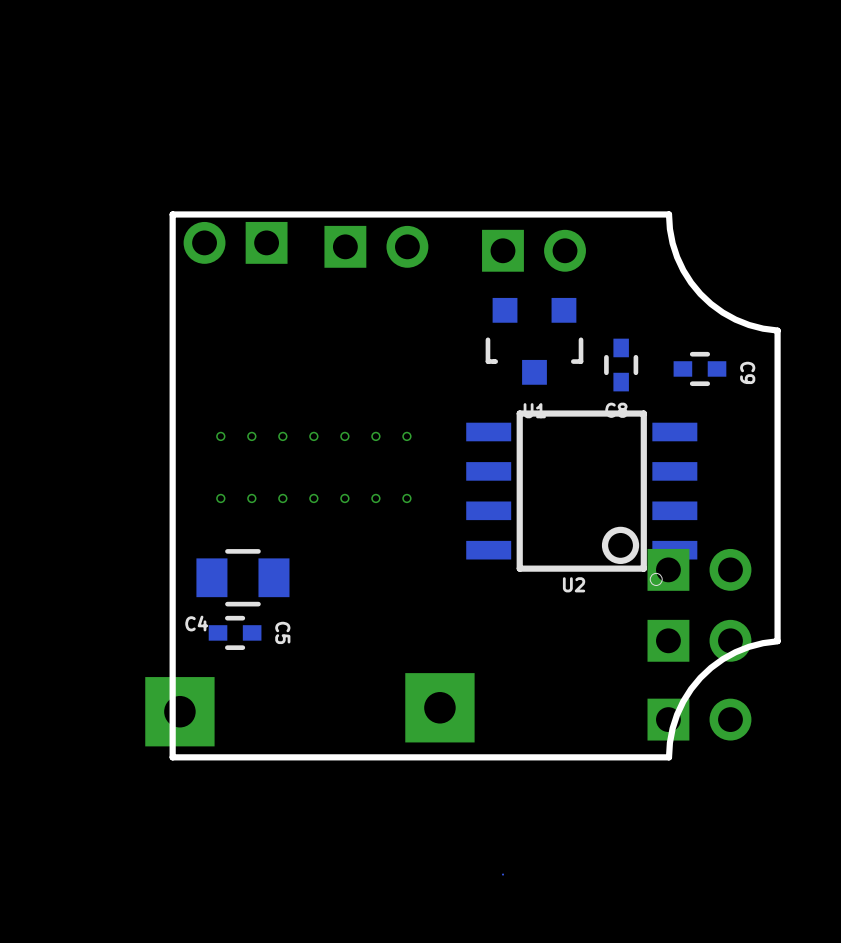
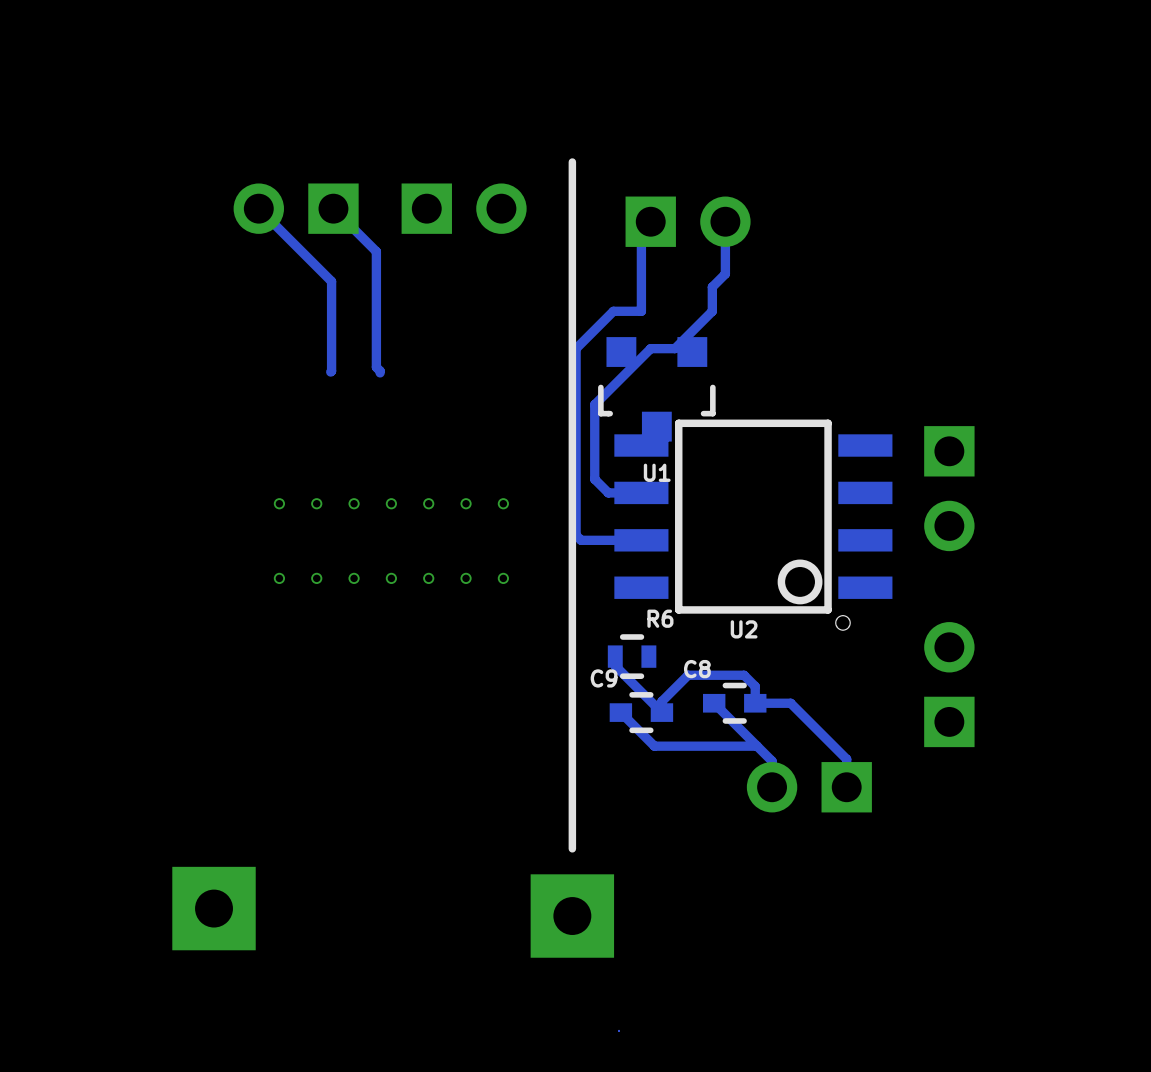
line: none -> (572, 162) (572, 848)
track: none -> (258, 208) (331, 281) (330, 372)
track: none -> (333, 208) (376, 251) (376, 367) (380, 372)
track: none -> (650, 221) (641, 231) (641, 311) (613, 311) (576, 348) (576, 535) (581, 540) (641, 540)
track: none -> (725, 221) (725, 273) (712, 287) (712, 311) (674, 348) (650, 348) (594, 404) (594, 479) (608, 492) (641, 492)
part position: (235, 242) -> (296, 208)
part position: (376, 246) -> (464, 208)
part position: (533, 250) -> (688, 221)
board edge: (777, 330) (763, 328) (735, 319) (722, 312) (700, 293) (683, 270) (677, 257) (669, 229) (669, 214) (172, 214) (172, 757) (669, 757) (669, 742) (677, 714) (683, 701) (700, 677) (722, 659) (735, 652) (763, 643) (777, 641) -> none
board edge: (777, 330) (777, 641) -> none
C8 rotation: 0° (621, 365) -> 90° clockwise (734, 703)
C8 position: (621, 365) -> (734, 703)
C9 position: (699, 368) -> (641, 712)
C9 name rotation: 0° (747, 372) -> 90° counterclockwise (604, 678)
C9 name position: C9 (747, 372) -> C9 (604, 678)
part: none -> (949, 488)
U2 position: (581, 491) -> (753, 516)
track: none -> (615, 656) (615, 665) (661, 712) (661, 701) (688, 675) (744, 675) (755, 686) (755, 703) (790, 703) (846, 759) (846, 787)
R6: none -> (632, 656)
part: (699, 569) -> none
C4: (242, 577) -> none
part: none -> (949, 684)
track: none -> (714, 703) (772, 761) (772, 787)
track: none -> (620, 712) (654, 746) (757, 746)
C5: (235, 632) -> none
part: (699, 640) -> none
part: none -> (809, 787)
part position: (439, 707) -> (572, 916)
part position: (179, 711) -> (214, 908)
part: (699, 719) -> none

